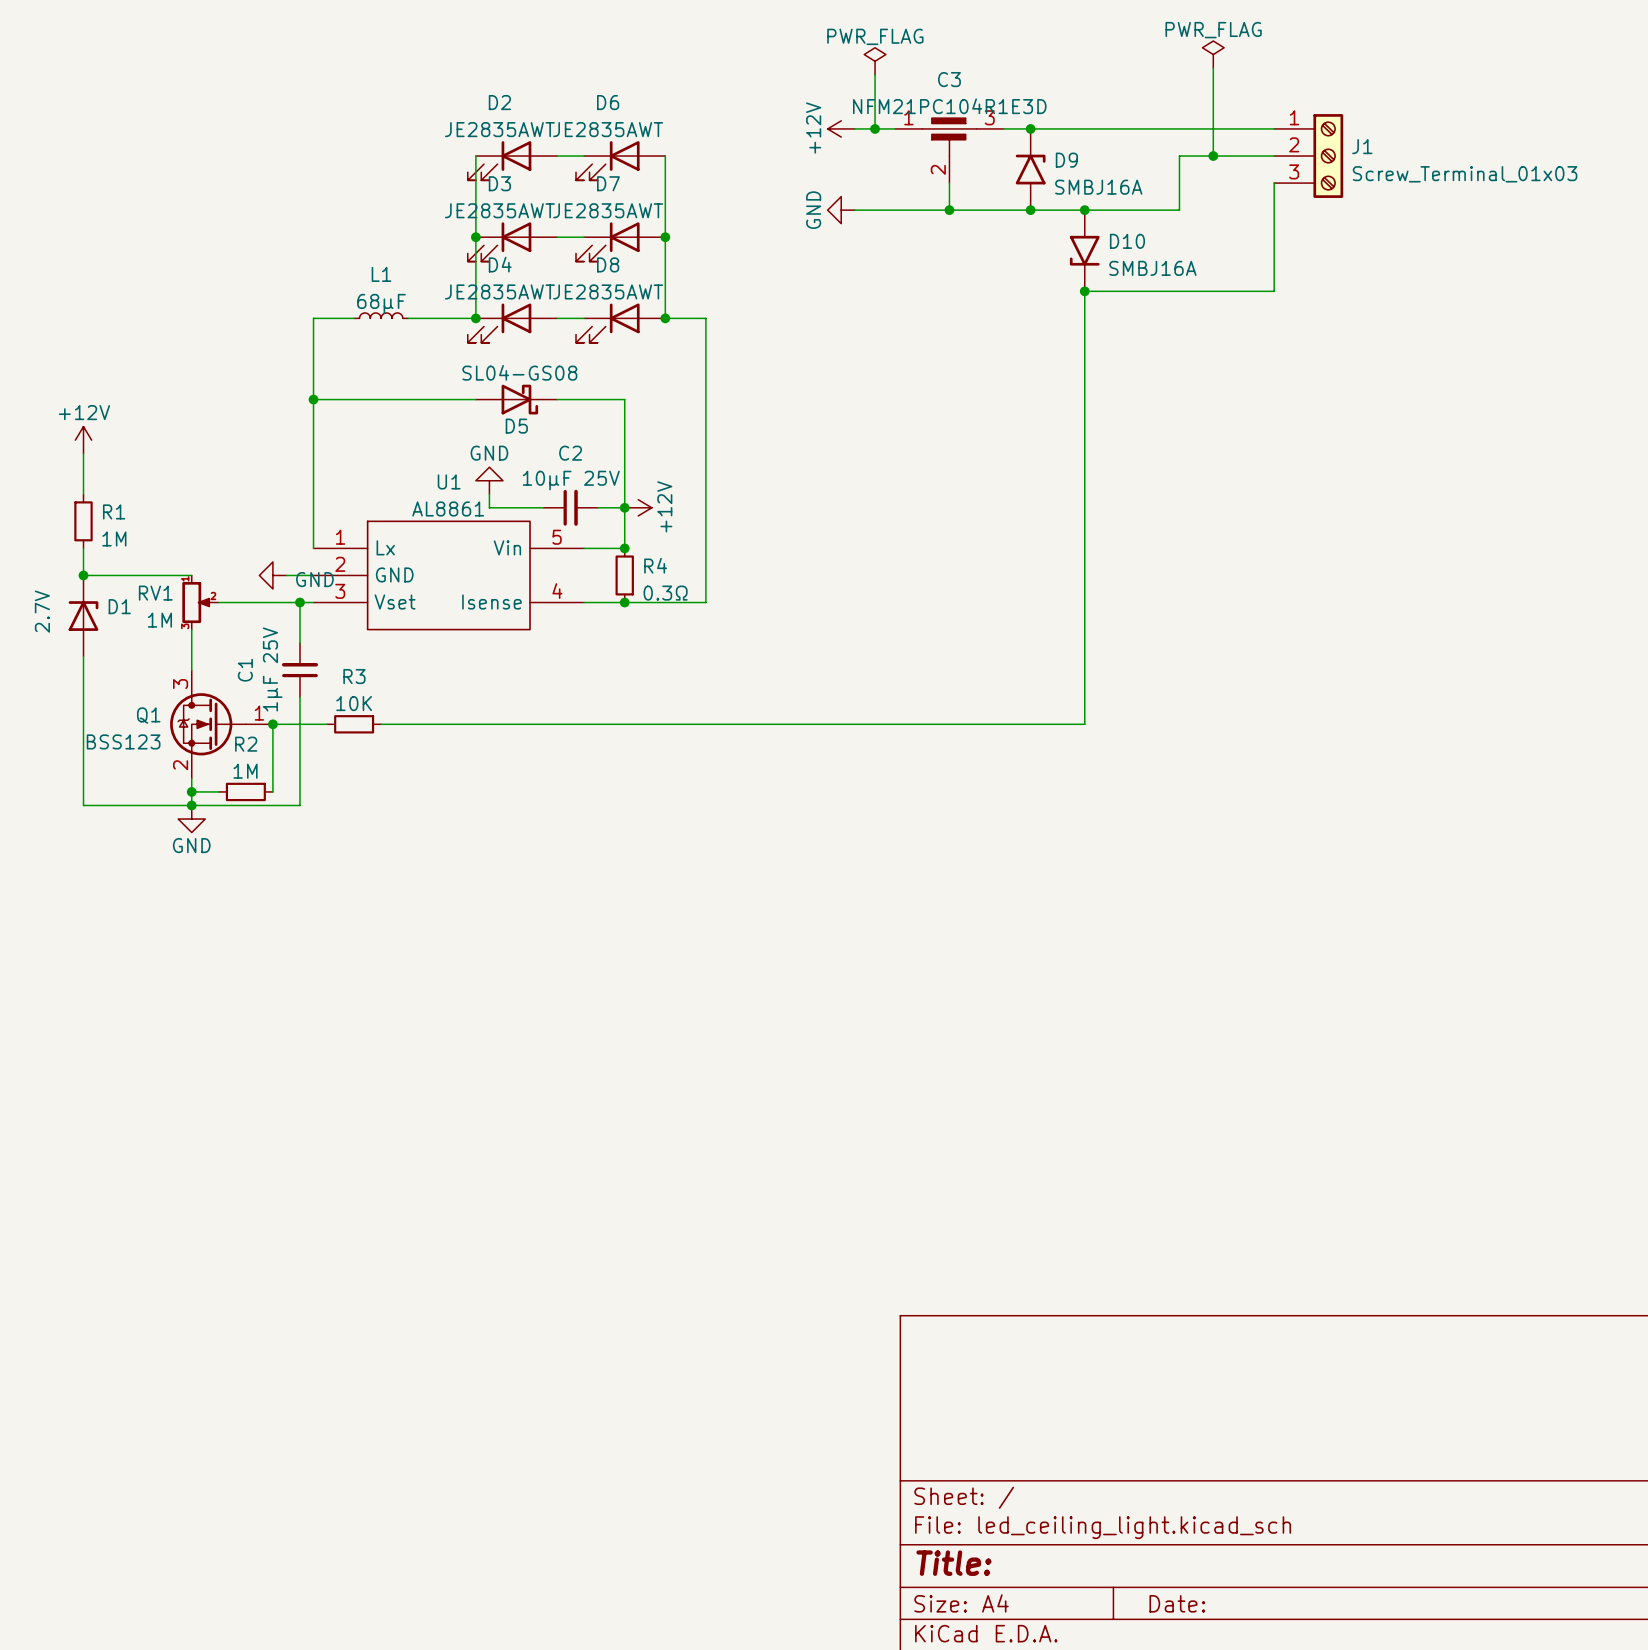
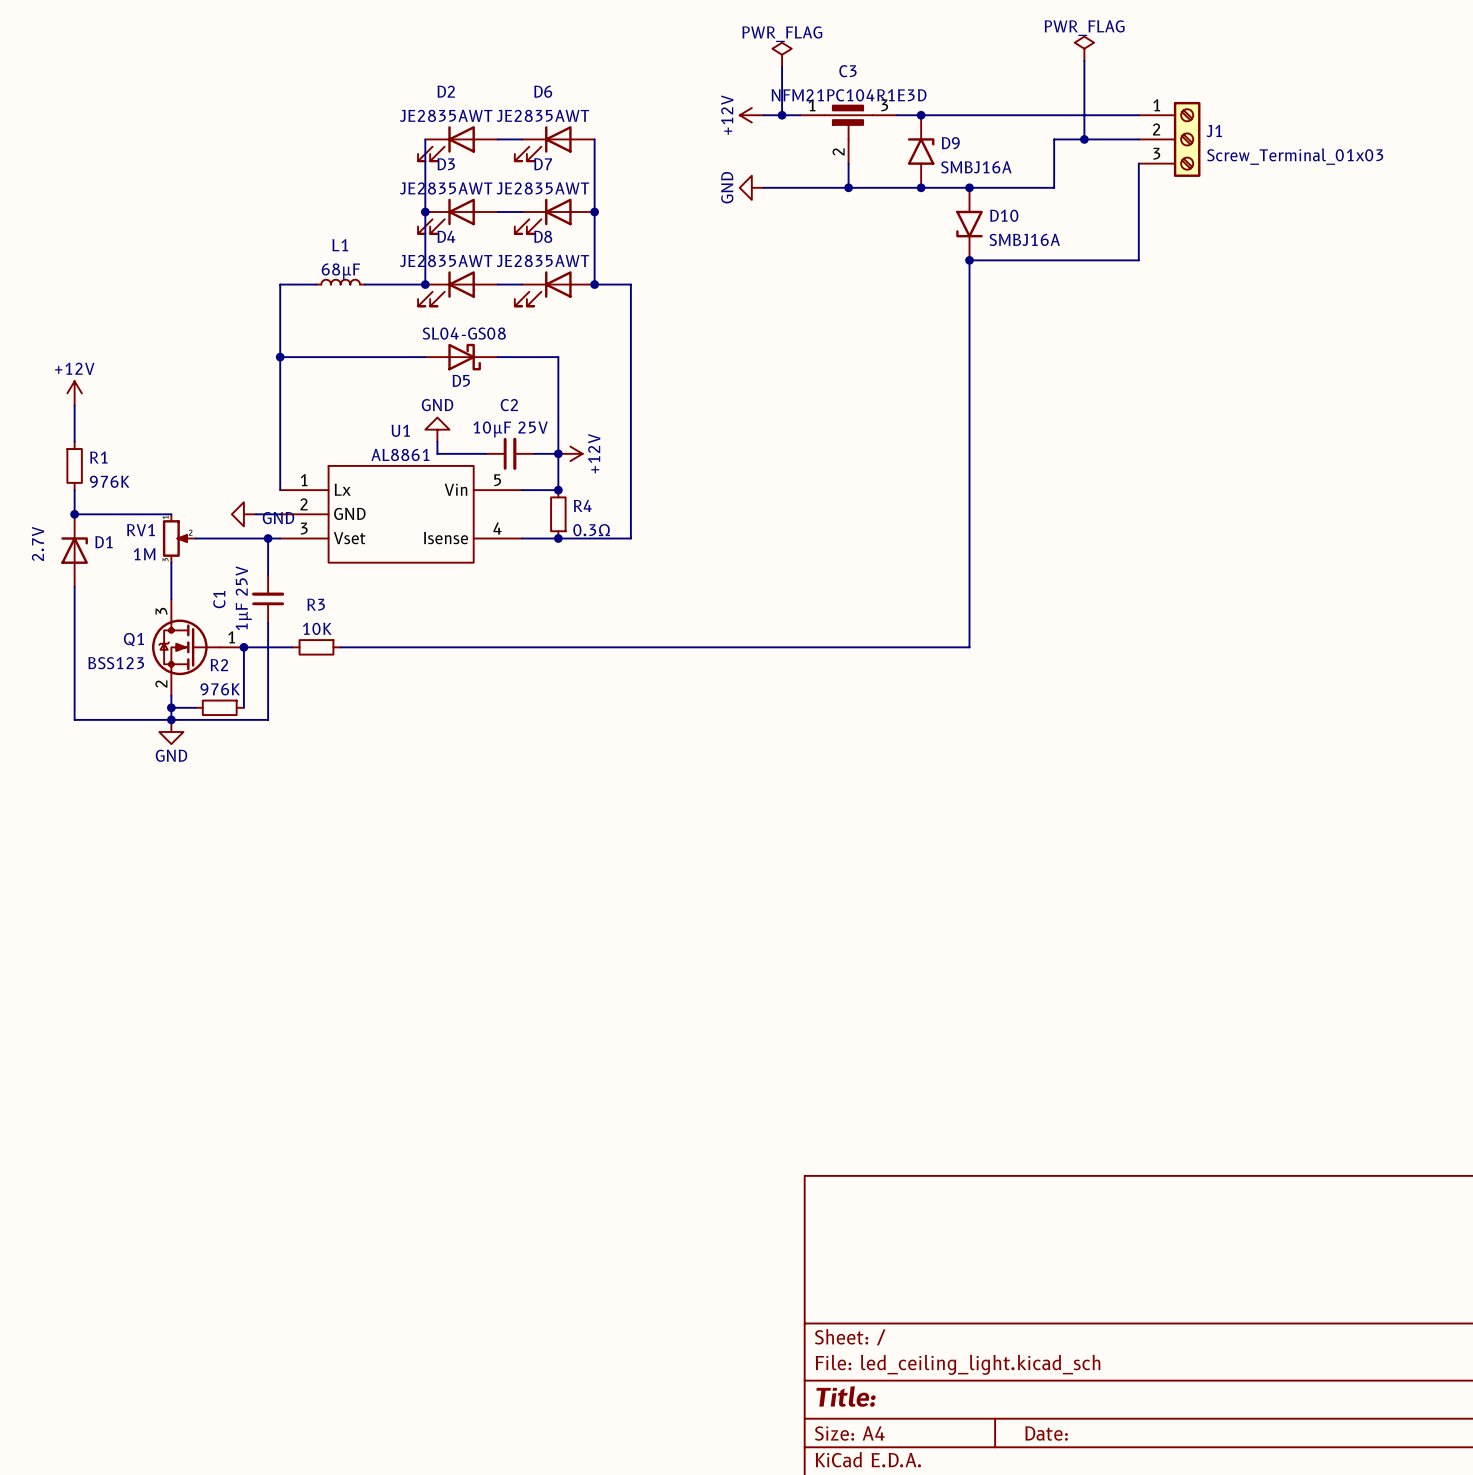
R1 value: 1M (114, 538) -> 976K (109, 481)
R2 value: 1M (245, 771) -> 976K (220, 689)

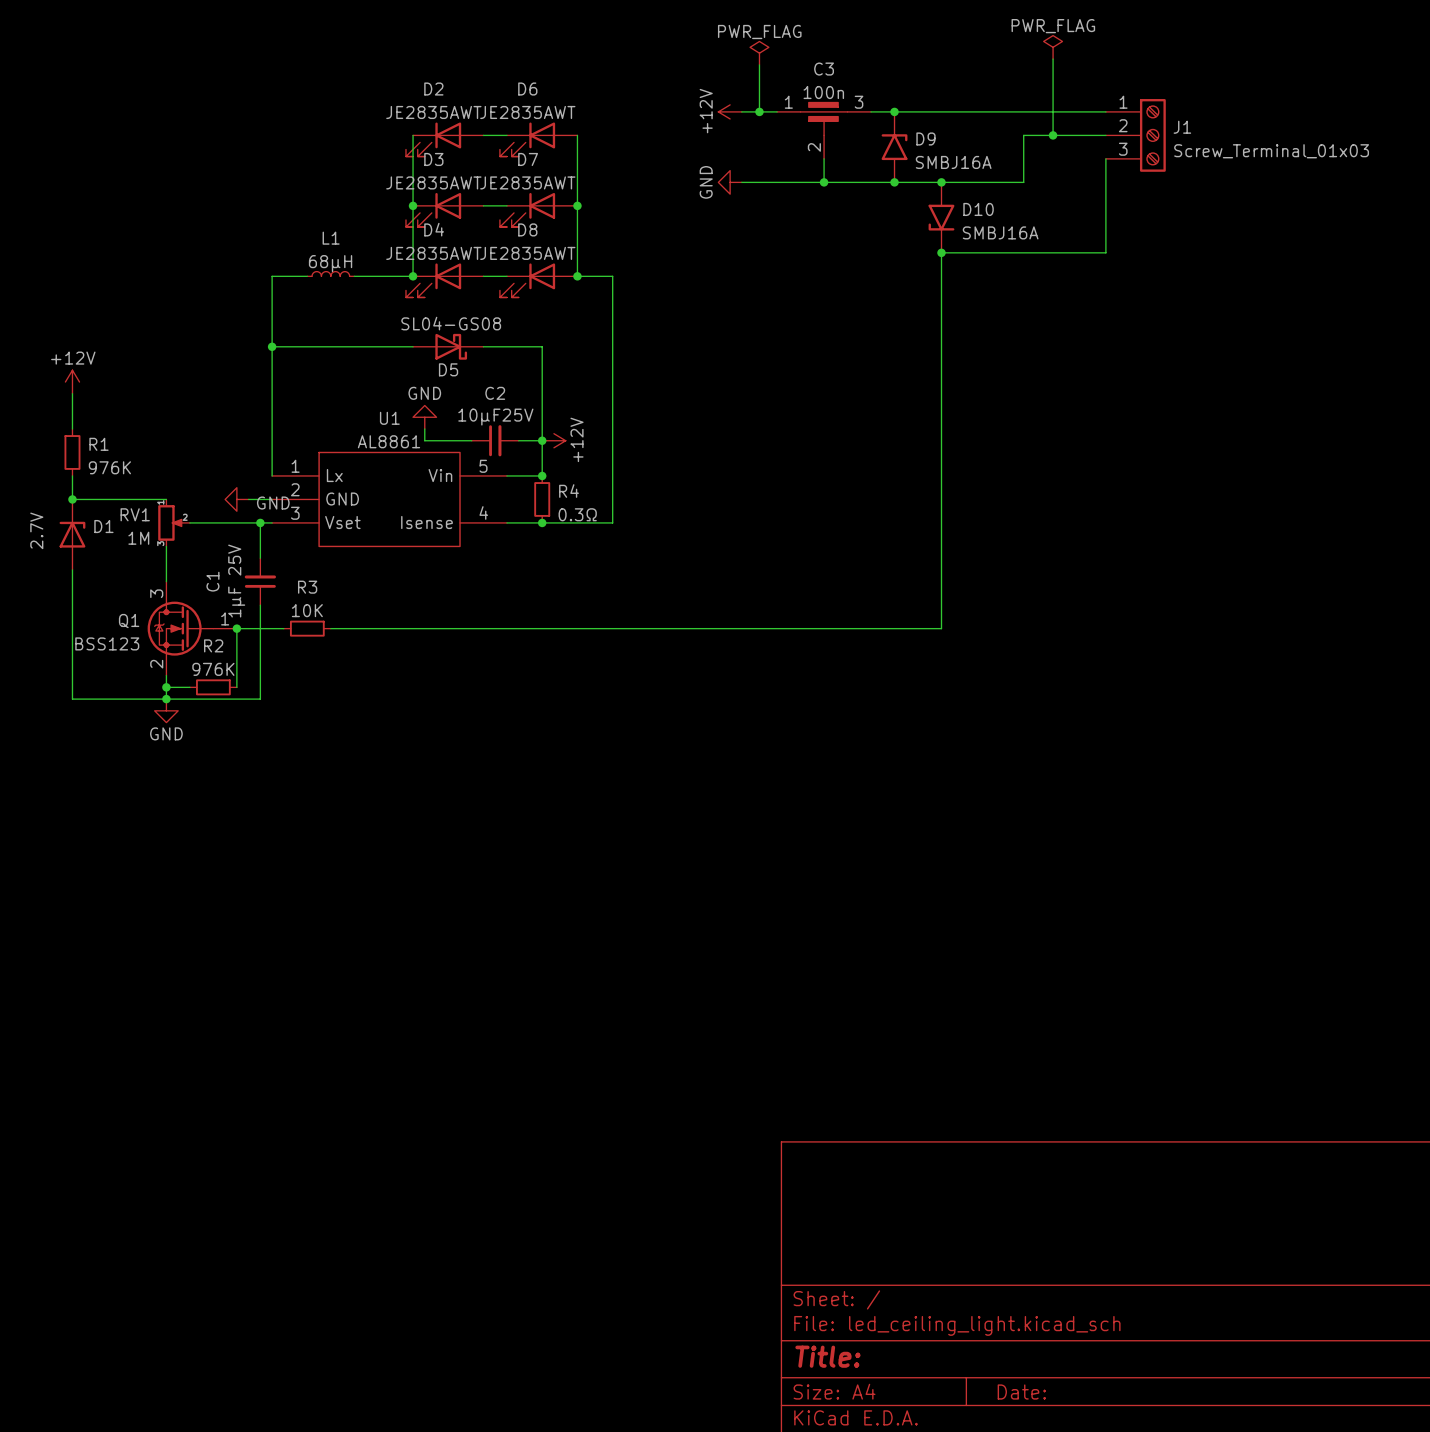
C3 value: NFM21PC104R1E3D (849, 95) -> 100n (823, 92)
L1 value: 68µF (340, 271) -> 68µH (330, 263)
C2 value: 10µF 25V (510, 429) -> 10µF25V (495, 417)

